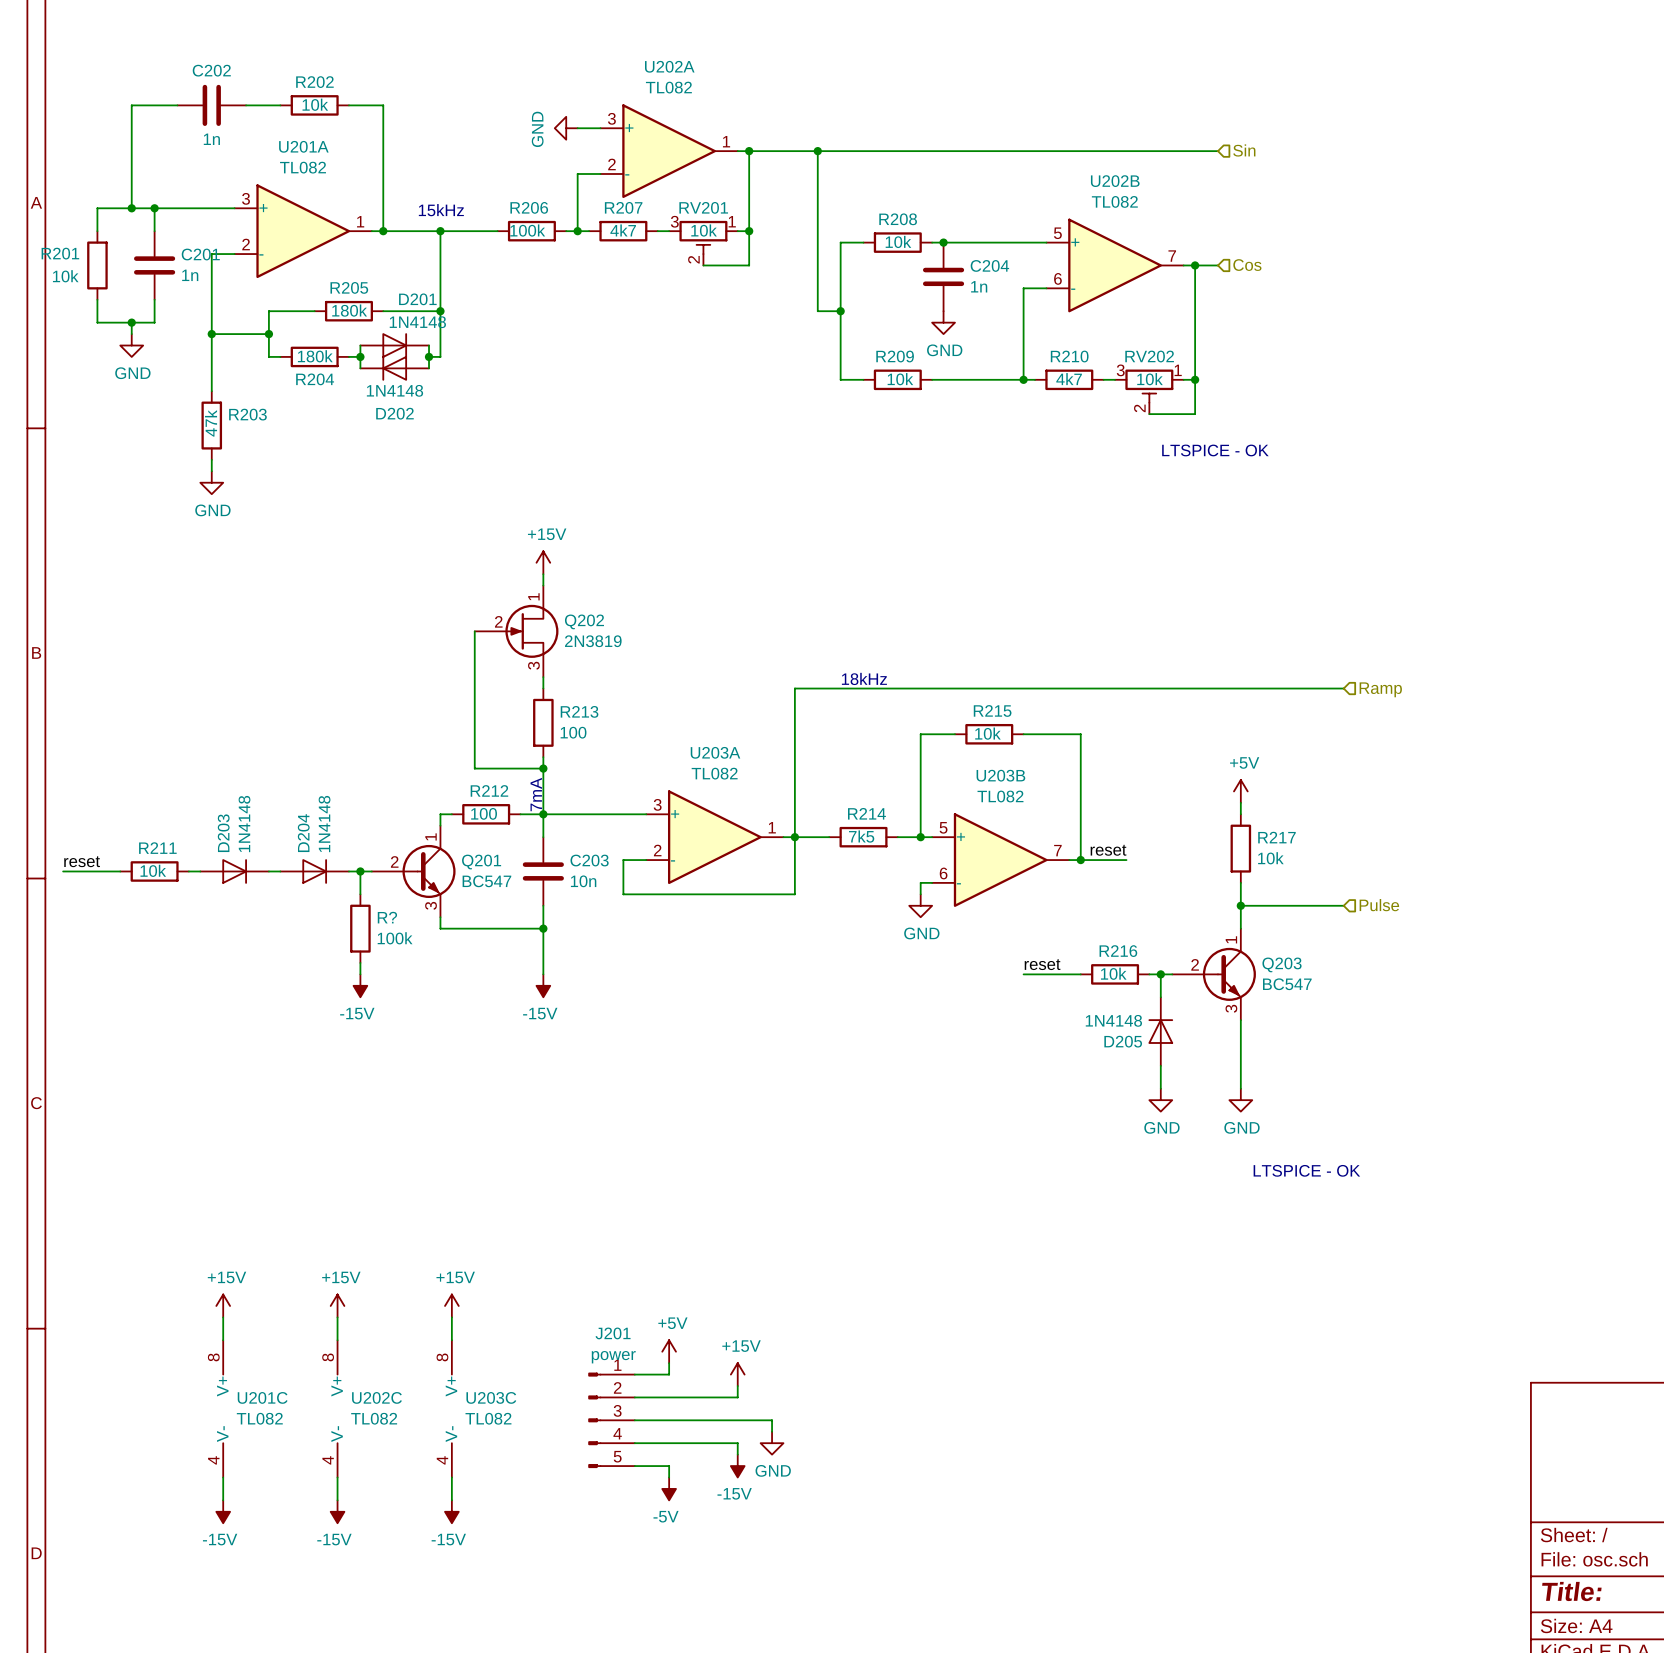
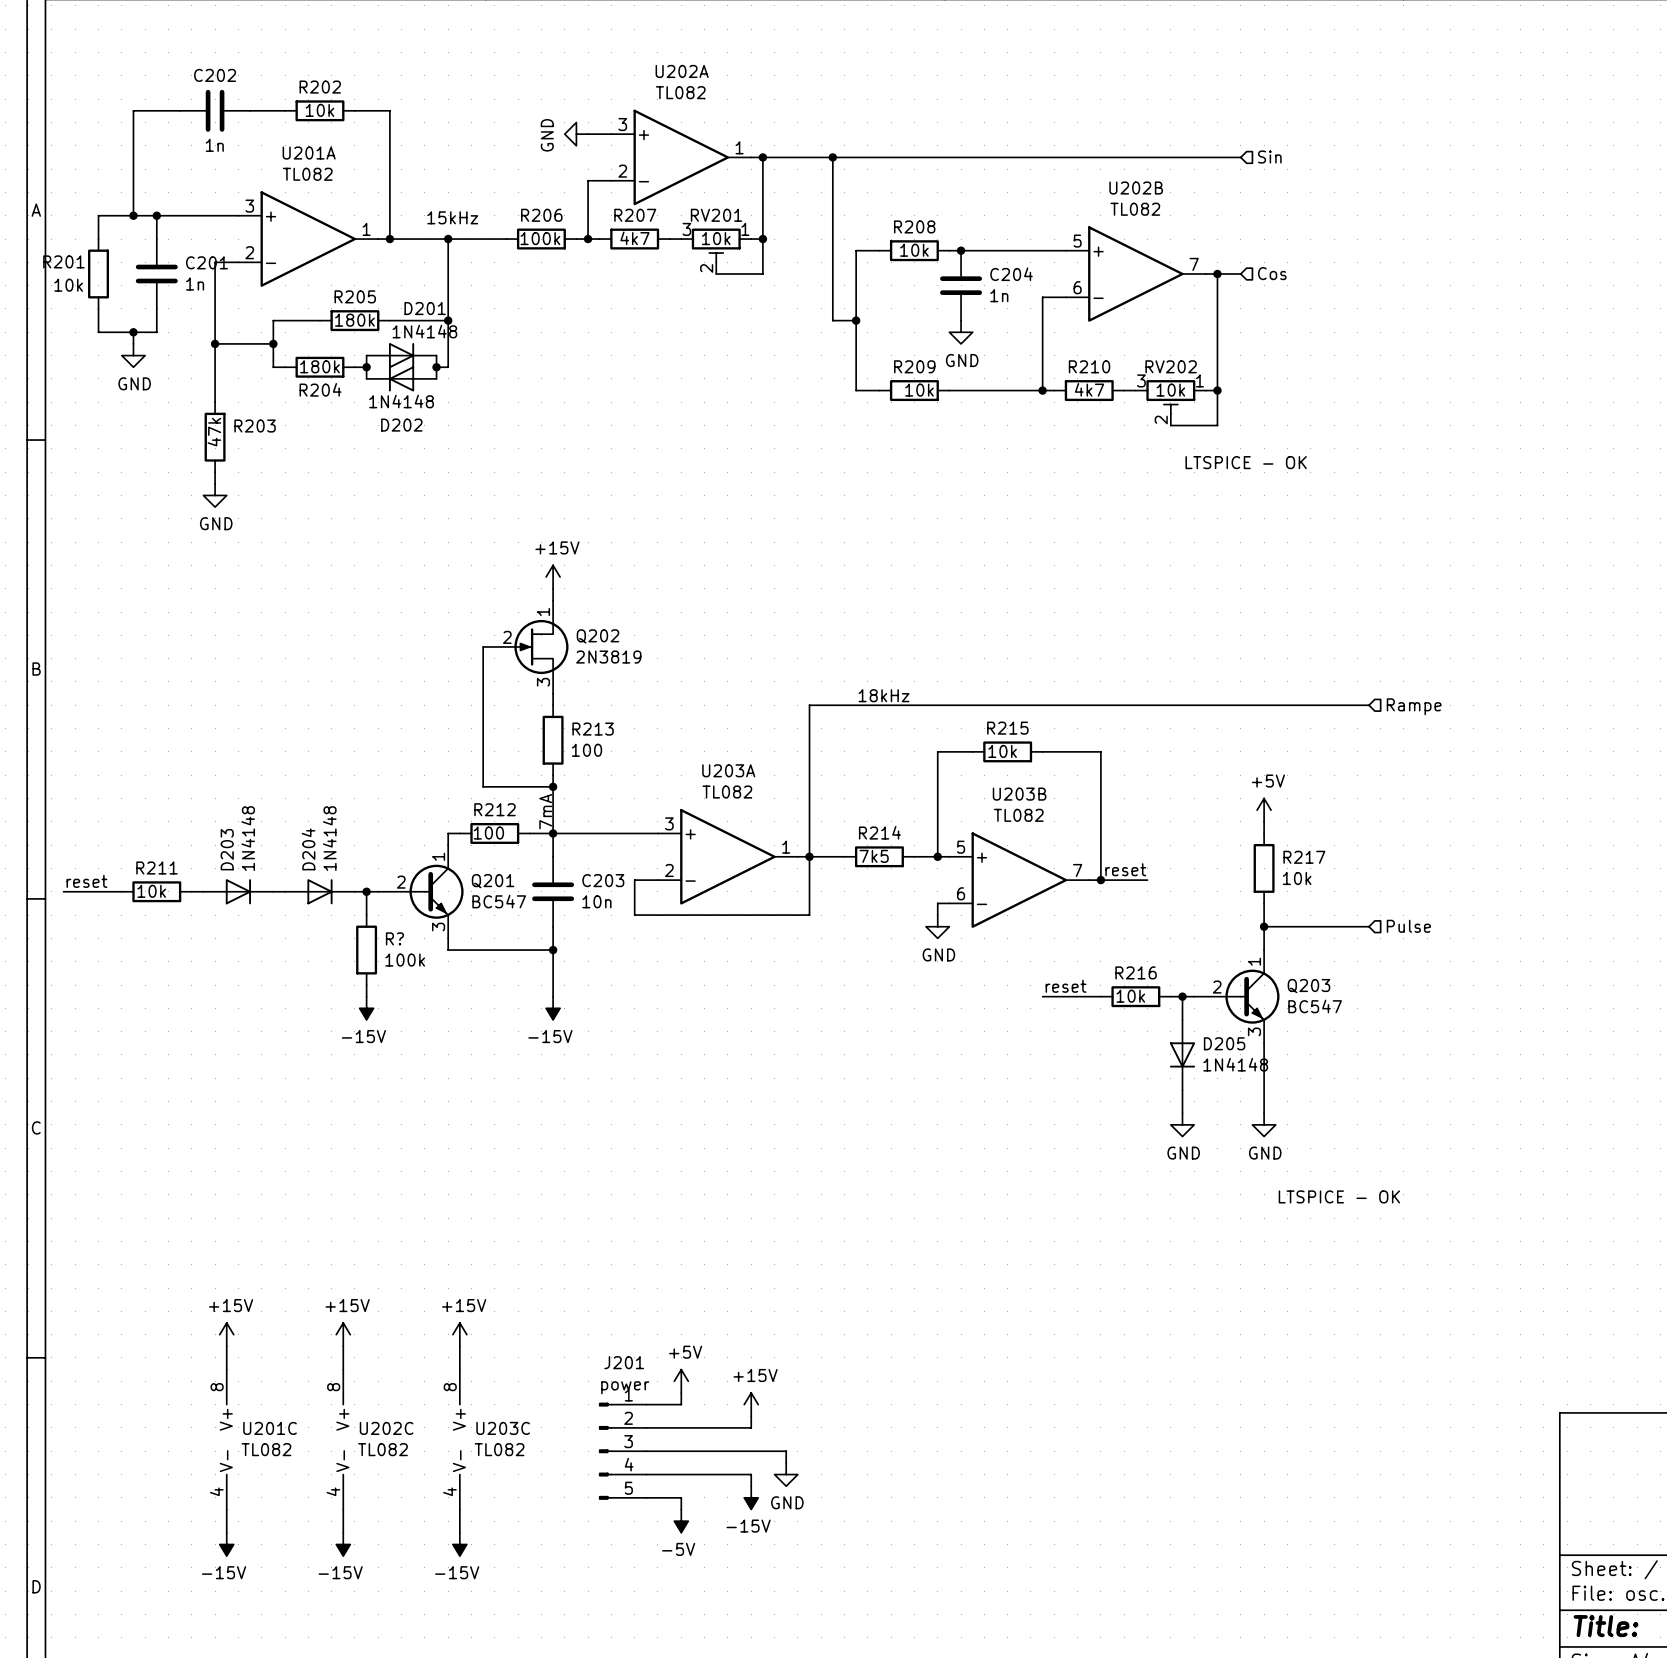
hierarchical label: Ramp (1380, 689) -> Rampe (1414, 706)
D205 rotation: 0° (1160, 1031) -> 180° (1182, 1054)

